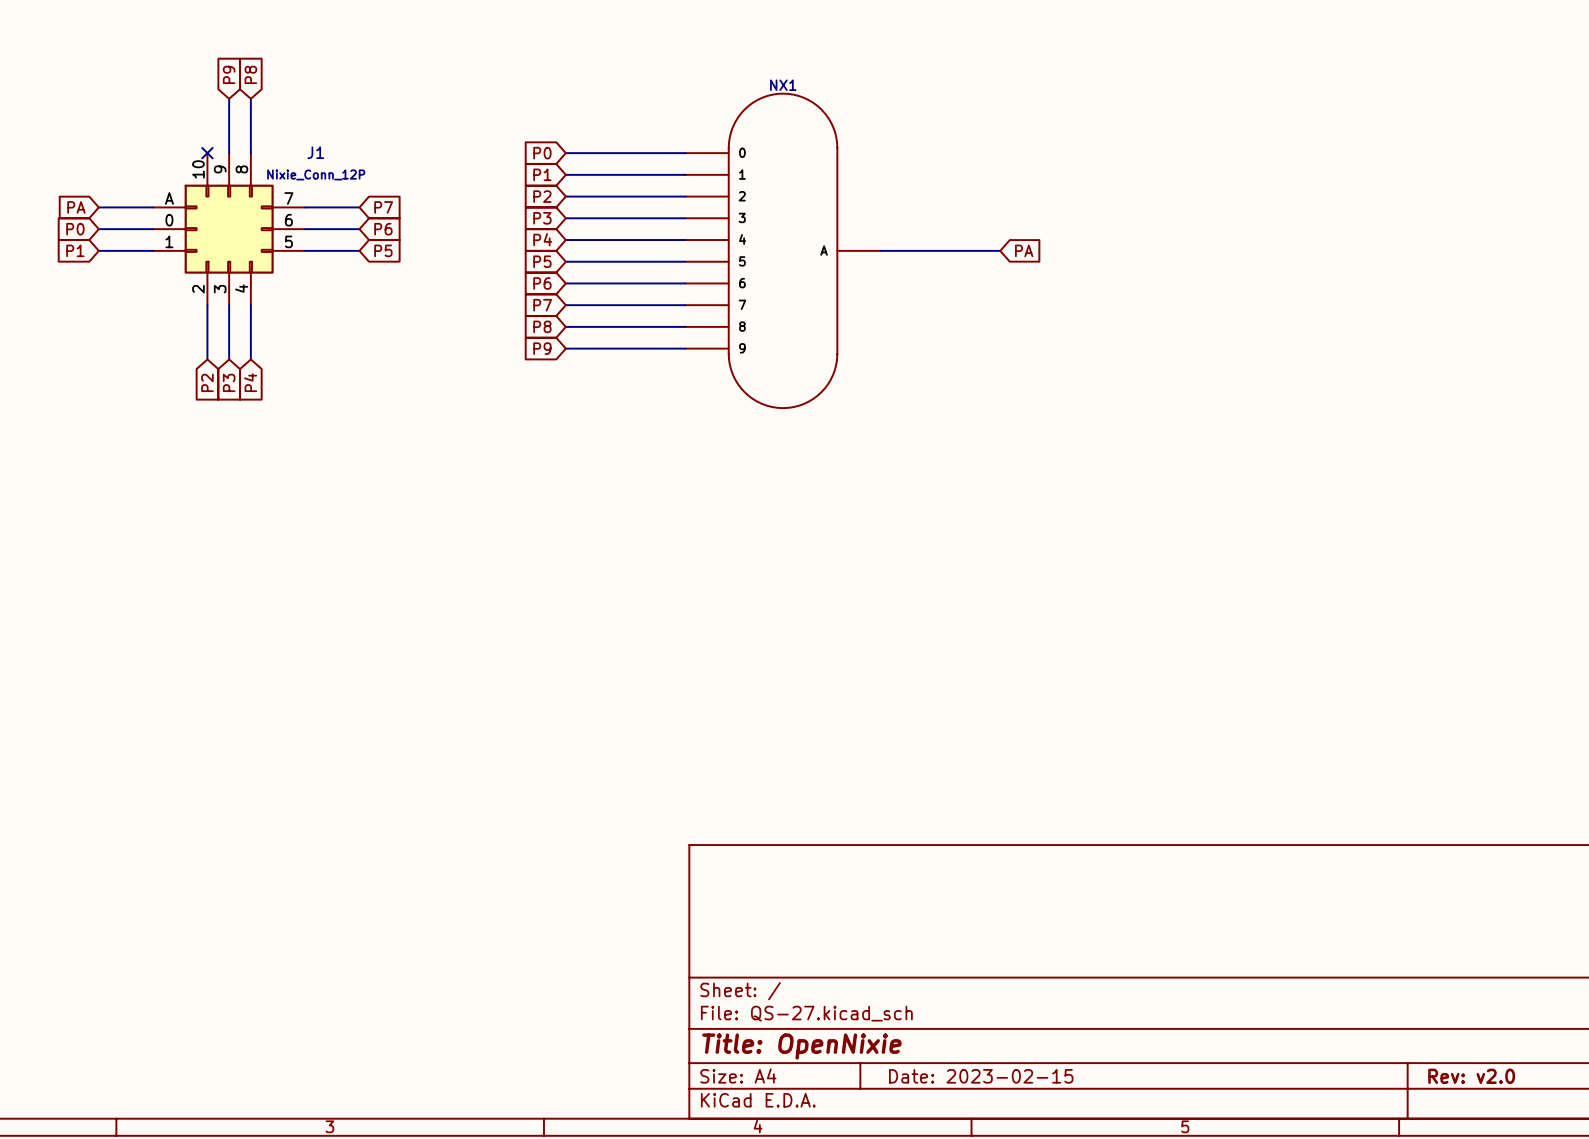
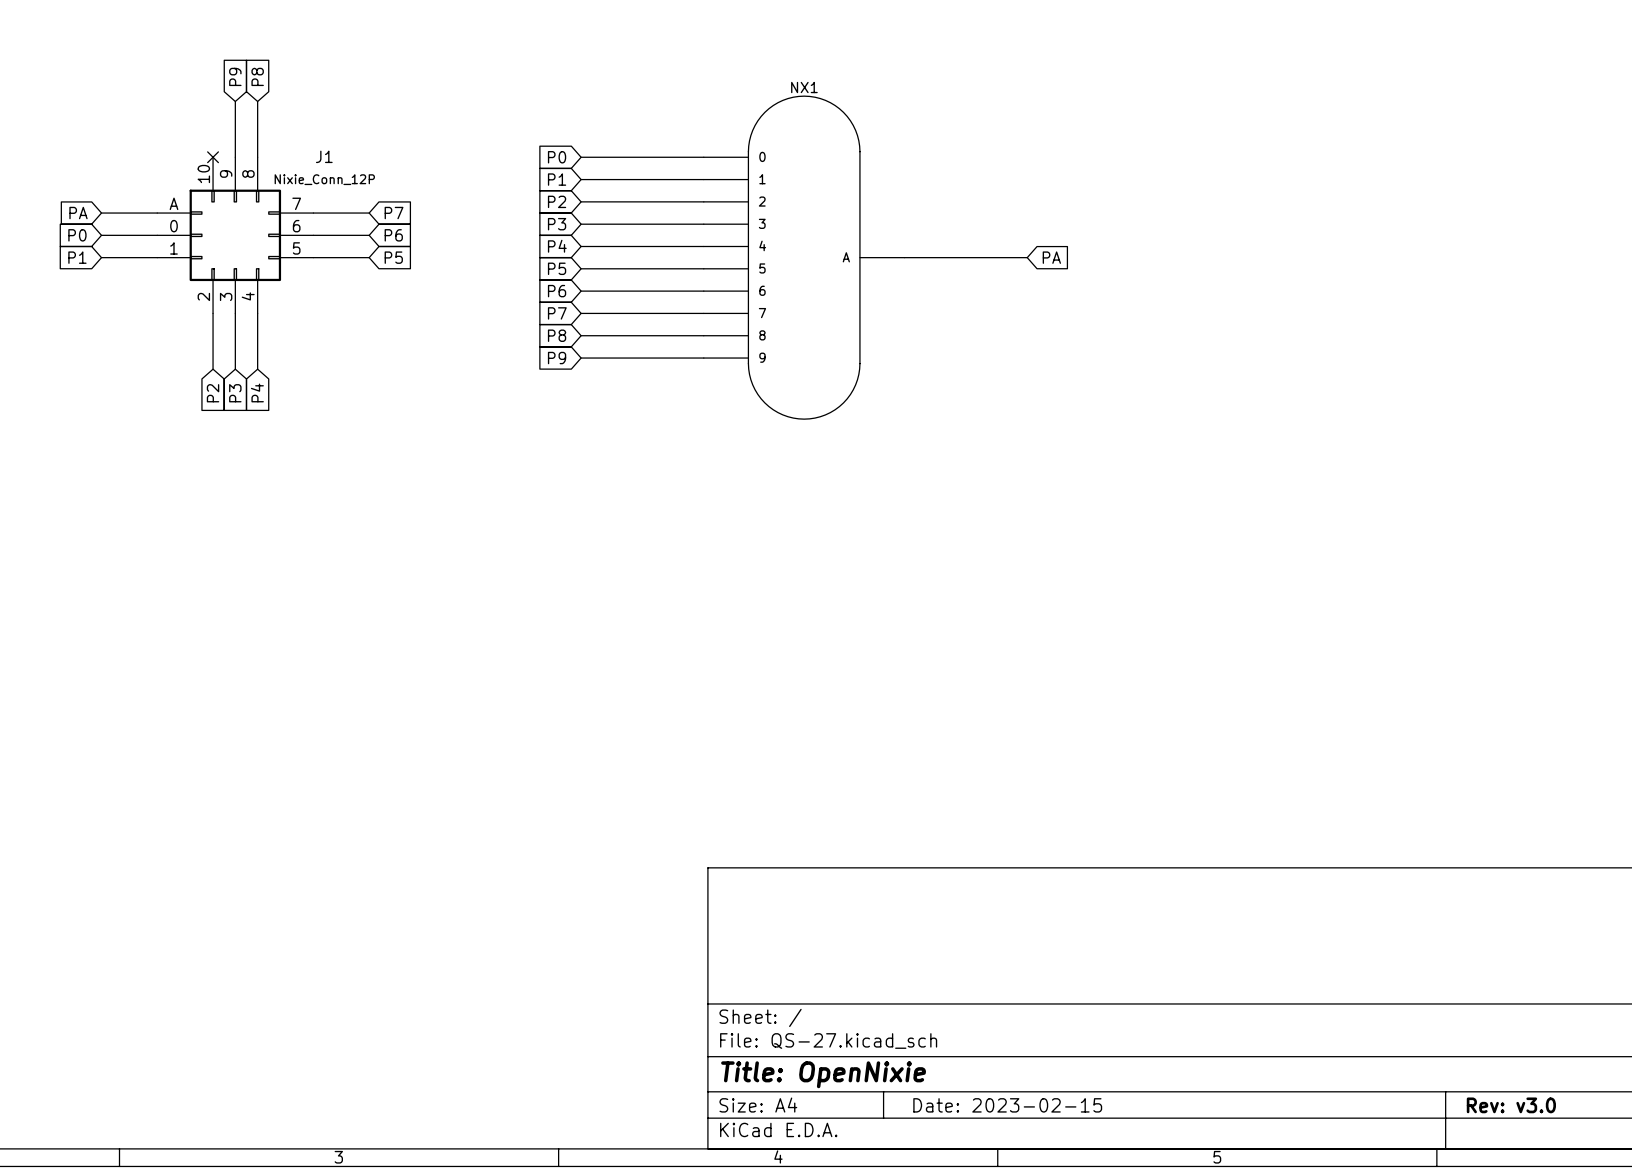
title block: Rev: v2.0 (1471, 1076) -> Rev: v3.0 (1511, 1105)

